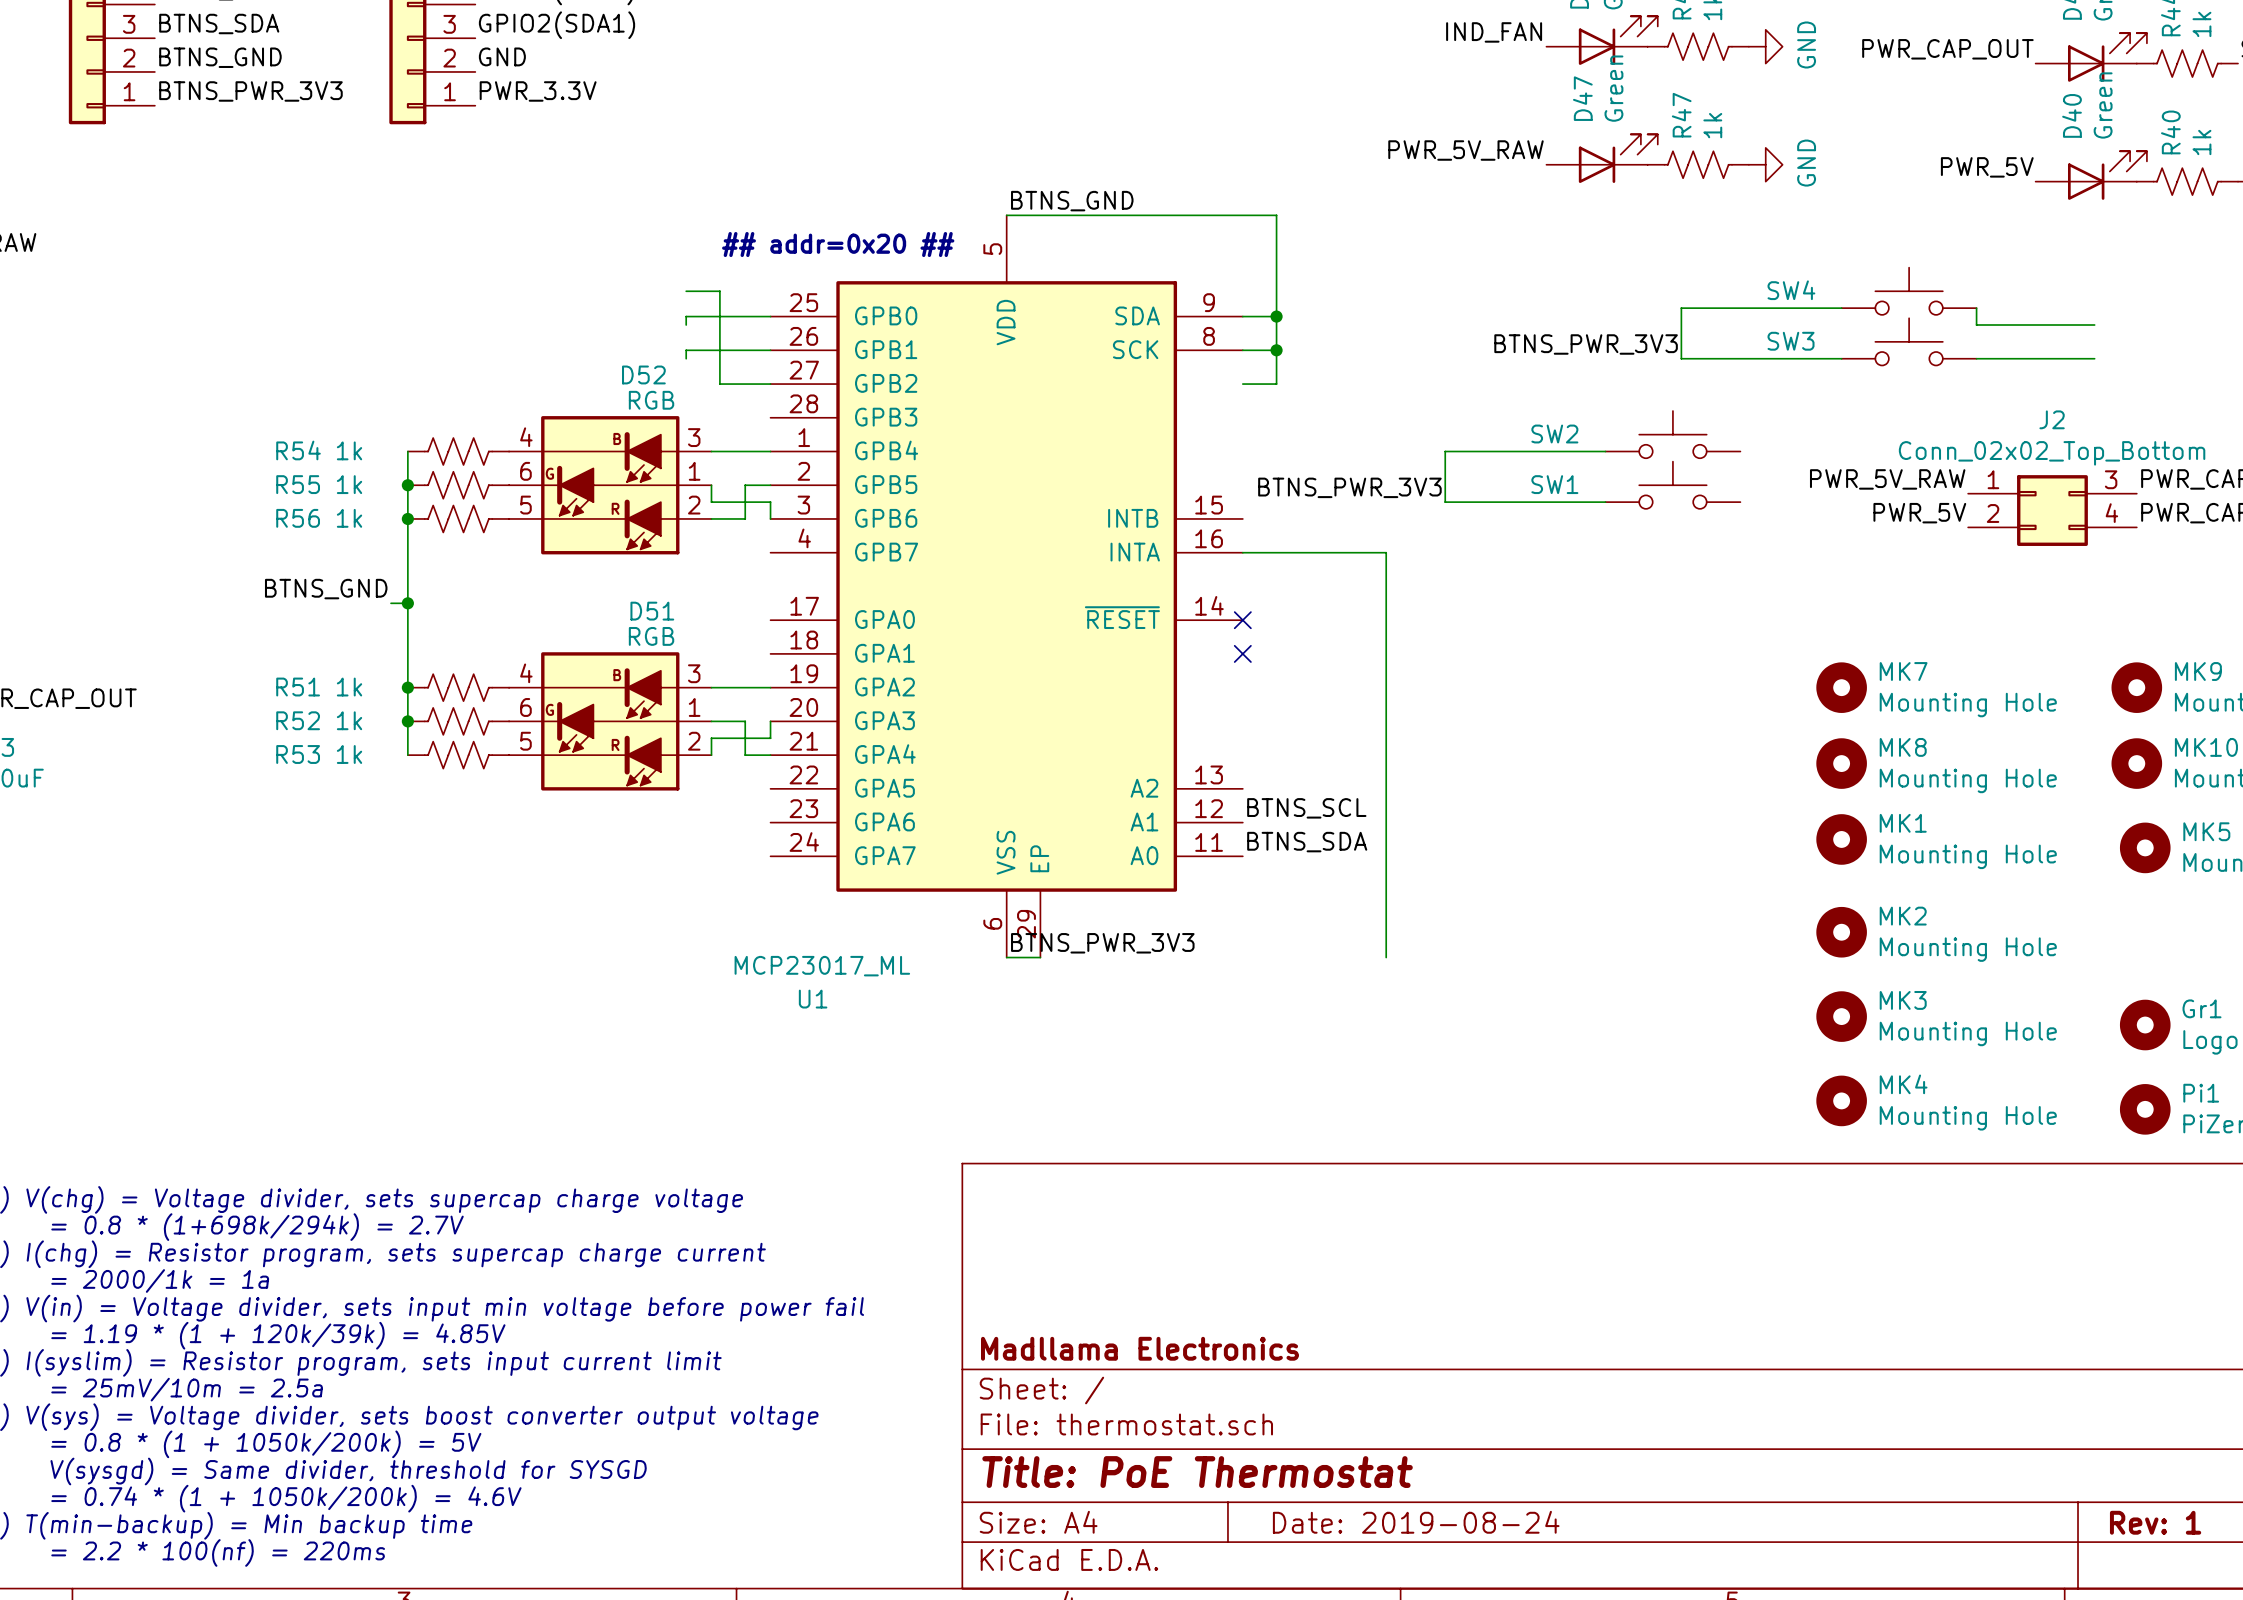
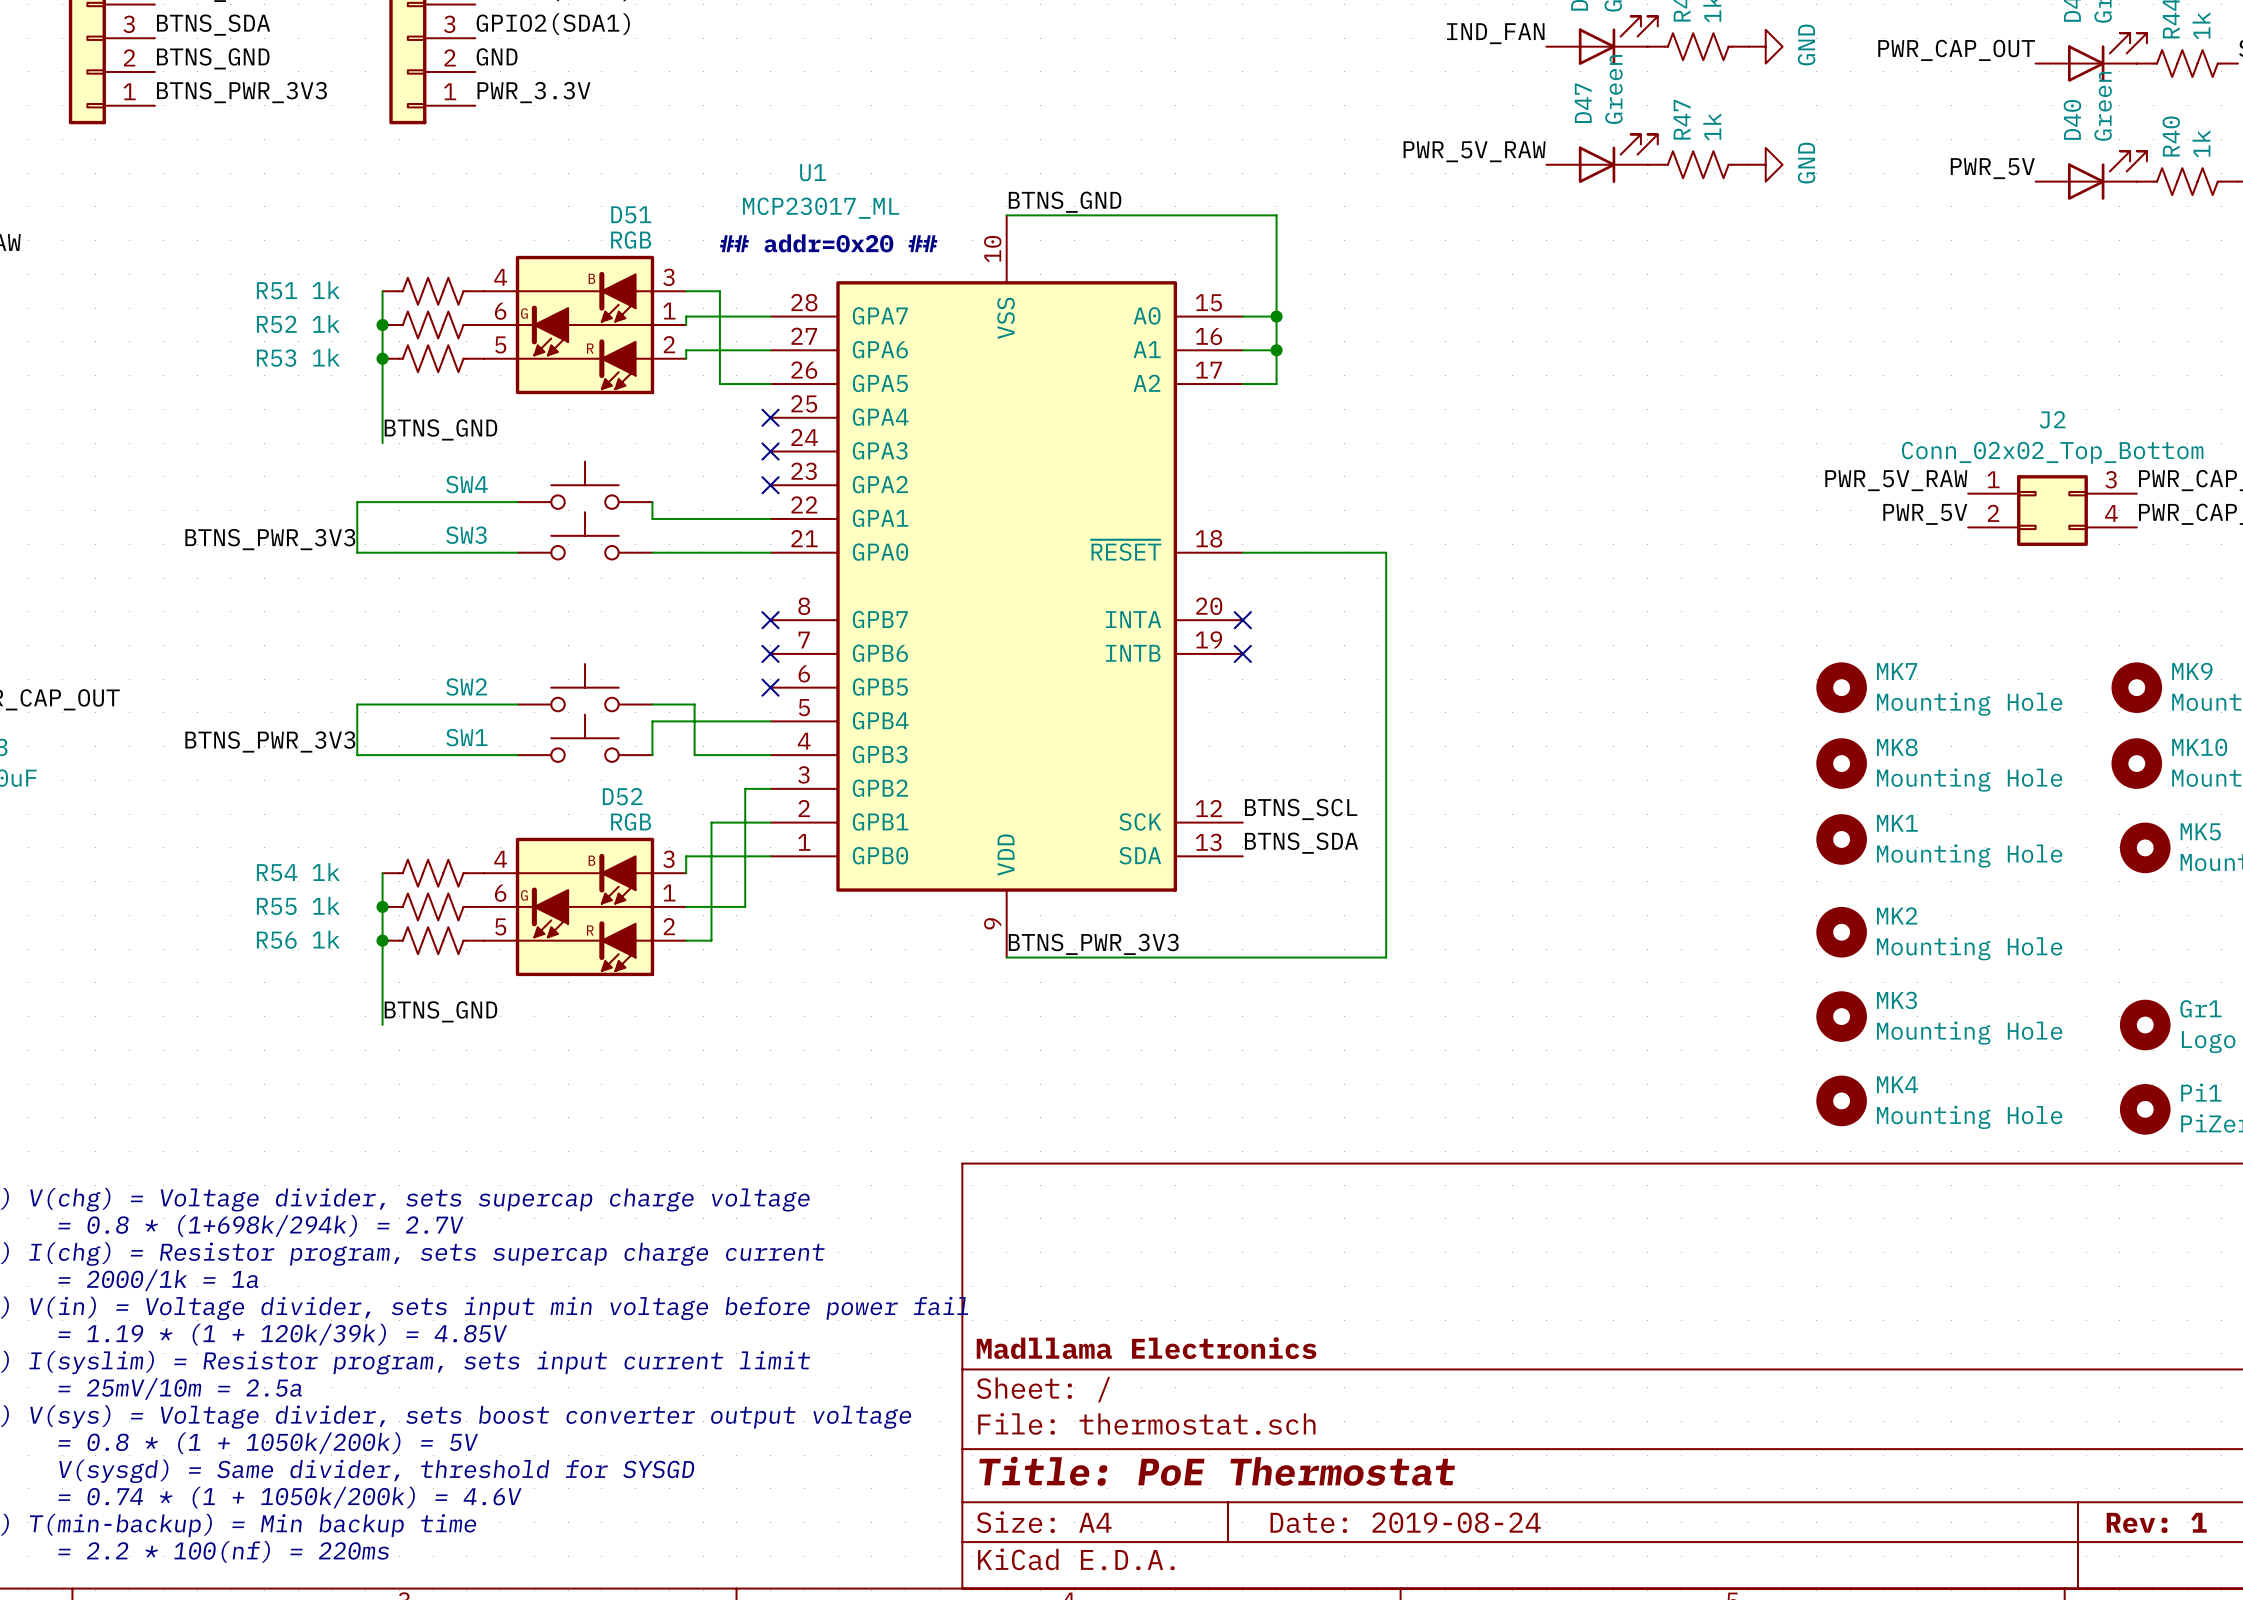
U1 symbol: [770, 215, 1243, 958] -> [770, 215, 1243, 958]
wire: none -> (382, 291) (382, 443)
SW4 position: (1909, 291) -> (584, 485)
wire: (1841, 308) (1681, 308) (1681, 358) (1841, 358) -> none
wire: (1976, 308) (1976, 325) (2094, 325) -> none
junction: none -> (382, 325)
SW3 position: (1909, 341) -> (584, 535)
label: BTNS_PWR_3V3 (1586, 344) -> none
junction: none -> (382, 358)
wire: (1976, 358) (2094, 358) -> none
no-connect mark: none -> (770, 417)
SW2 position: (1672, 434) -> (584, 687)
wire: (407, 451) (407, 755) -> none
R54 position: (458, 451) -> (433, 873)
wire: (711, 451) (770, 451) -> none
no-connect mark: none -> (770, 451)
wire: (1605, 451) (1445, 451) (1445, 502) (1605, 502) -> none
junction: (407, 485) -> none
R55 position: (458, 485) -> (433, 906)
D52 position: (610, 485) -> (584, 906)
wire: (711, 485) (711, 502) (770, 502) (770, 518) -> none
wire: (770, 485) (745, 485) (745, 518) -> (770, 518) (745, 518)
no-connect mark: none -> (770, 485)
SW1 position: (1672, 485) -> (584, 738)
label: BTNS_PWR_3V3 (1349, 487) -> none
wire: none -> (517, 502) (357, 502) (357, 552) (517, 552)
junction: (407, 518) -> none
R56 position: (458, 518) -> (433, 940)
label: none -> BTNS_PWR_3V3 (270, 539)
wire: none -> (652, 552) (770, 552)
label position: BTNS_GND (326, 589) -> BTNS_GND (440, 429)
wire: (391, 603) (407, 603) -> none
junction: (407, 603) -> none
no-connect mark: none -> (770, 620)
no-connect mark: none -> (770, 653)
junction: (407, 687) -> none
R51 position: (458, 687) -> (433, 291)
wire: (711, 687) (770, 687) -> none
no-connect mark: none -> (770, 687)
wire: none -> (517, 704) (357, 704) (357, 755) (517, 755)
wire: none -> (652, 704) (694, 704) (694, 755) (745, 755)
junction: (407, 721) -> none
R52 position: (458, 721) -> (433, 325)
D51 position: (610, 721) -> (584, 325)
wire: (745, 721) (745, 755) -> (745, 721) (770, 721)
wire: (770, 721) (770, 738) (711, 738) (711, 755) -> none
label: none -> BTNS_PWR_3V3 (270, 741)
R53 position: (458, 755) -> (433, 358)
wire: none -> (770, 788) (745, 788) (745, 906) (686, 906)
wire: none -> (770, 822) (711, 822) (711, 940) (686, 940)
wire: none -> (770, 856) (686, 856) (686, 873)
wire: none -> (382, 873) (382, 1025)
junction: none -> (382, 906)
junction: none -> (382, 940)
wire: none -> (1040, 957) (1386, 957)
U1 value position: MCP23017_ML (822, 966) -> MCP23017_ML (821, 208)
U1 name position: U1 (813, 999) -> U1 (813, 172)
label: none -> BTNS_GND (440, 1011)

